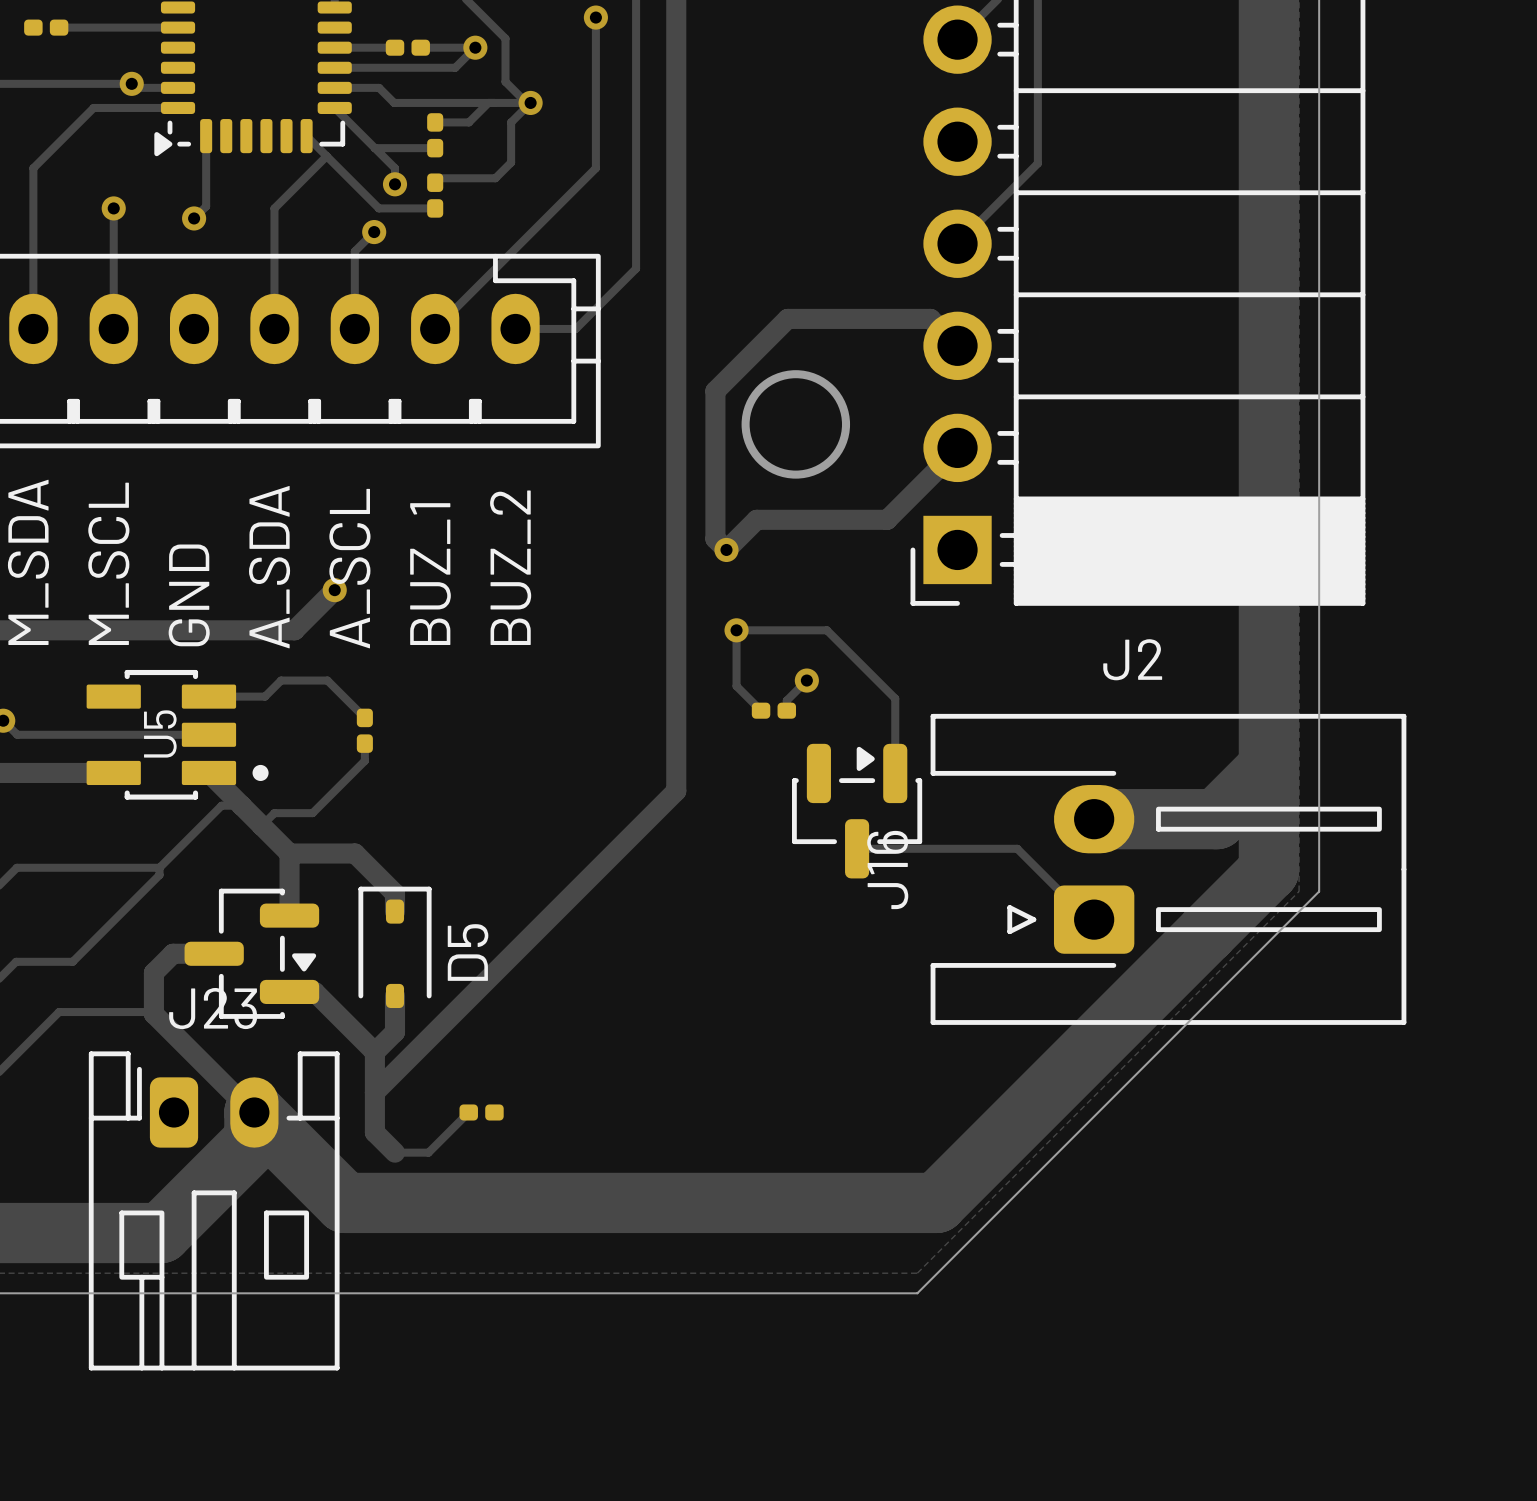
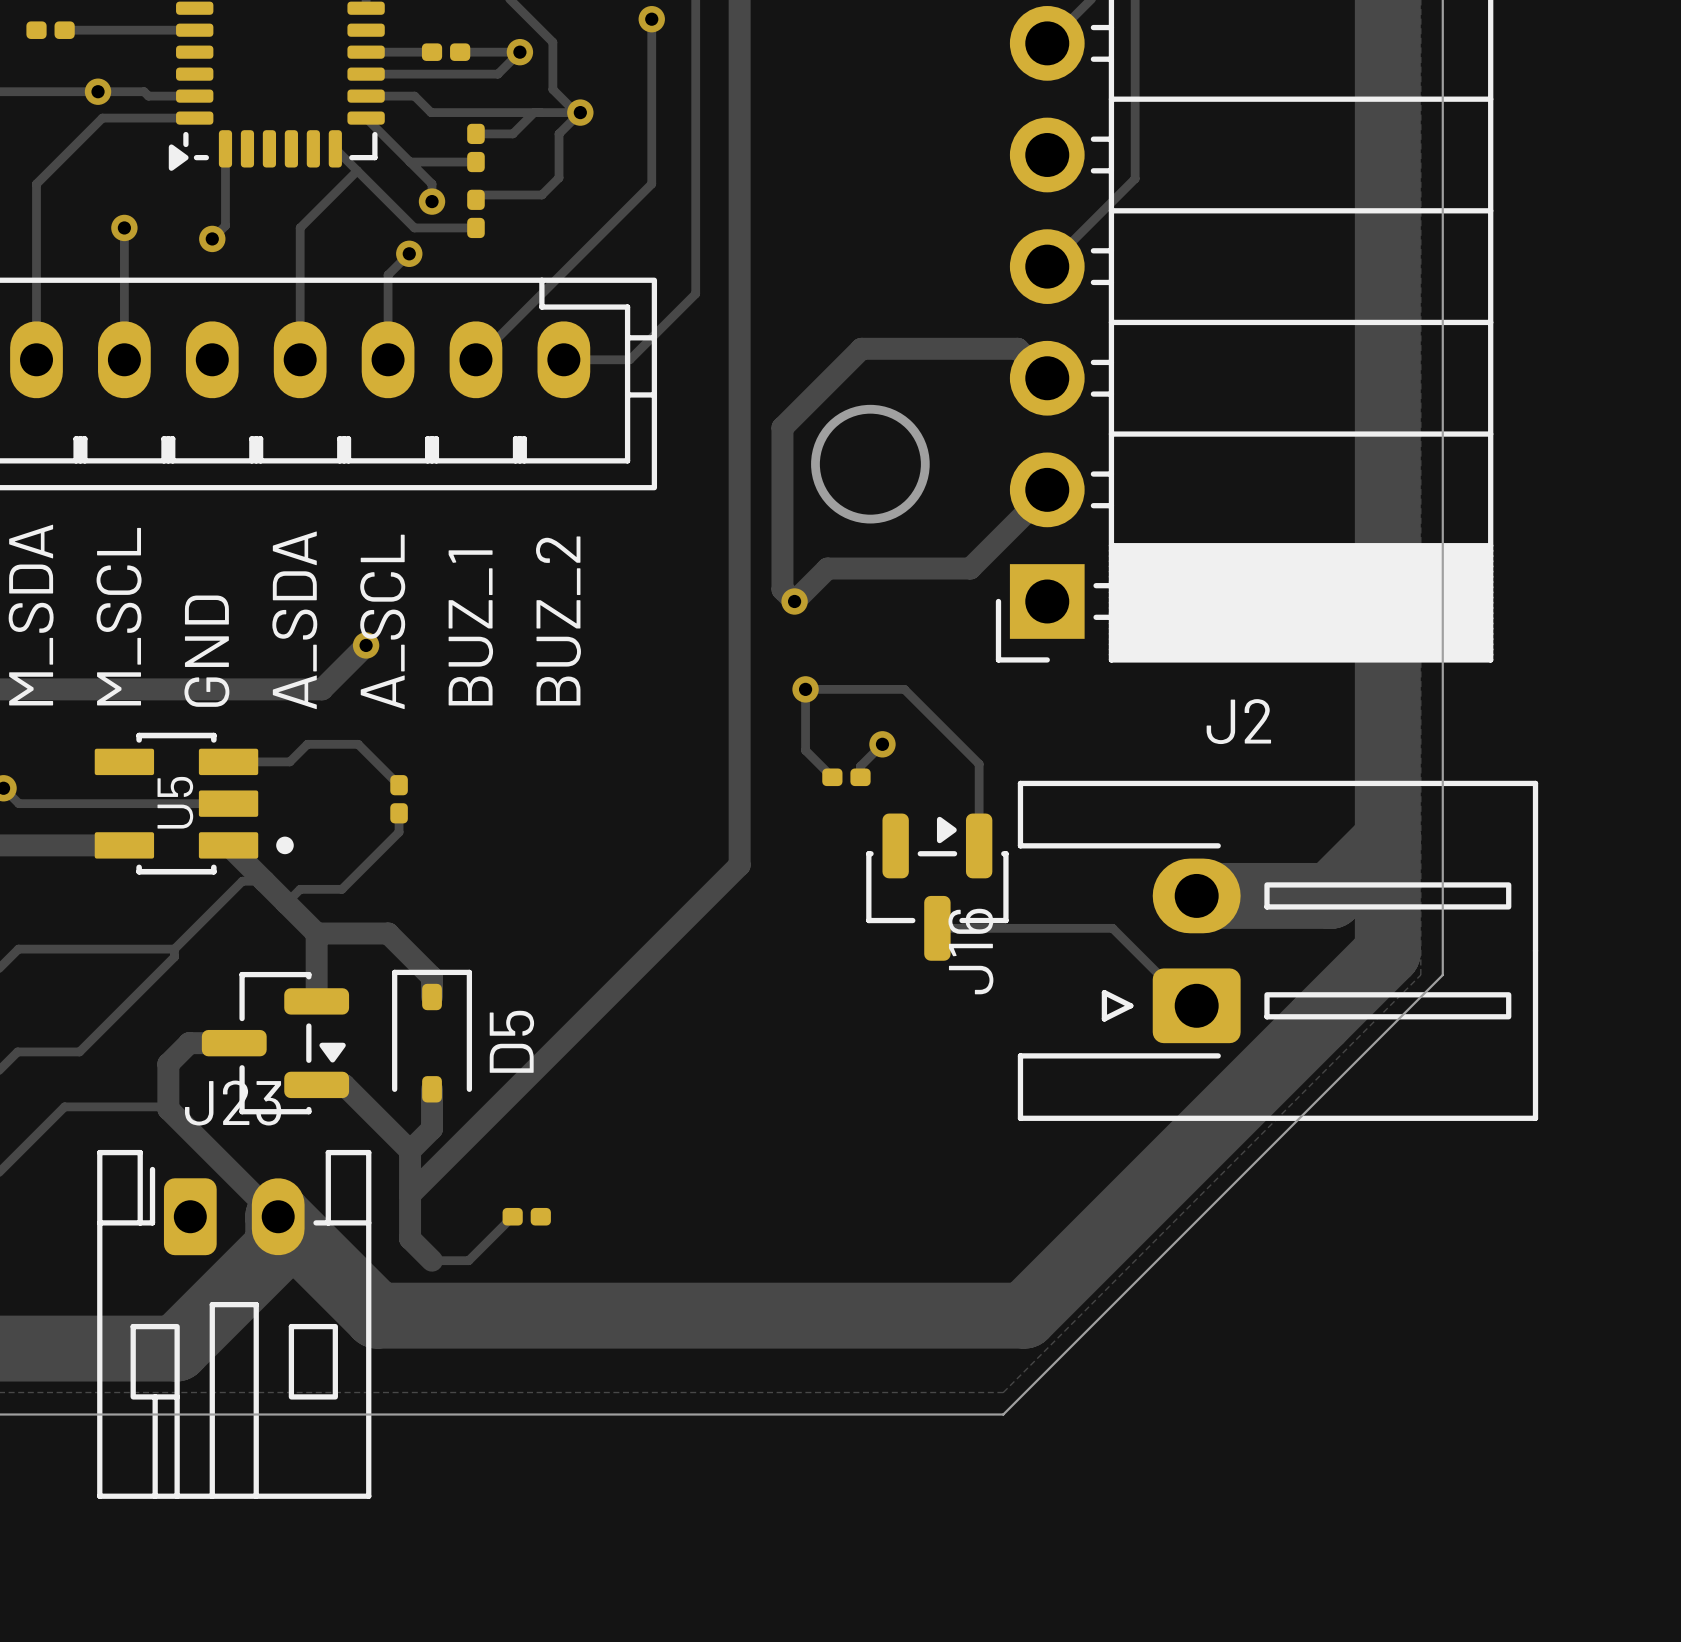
via position: (131, 83) -> (98, 91)

